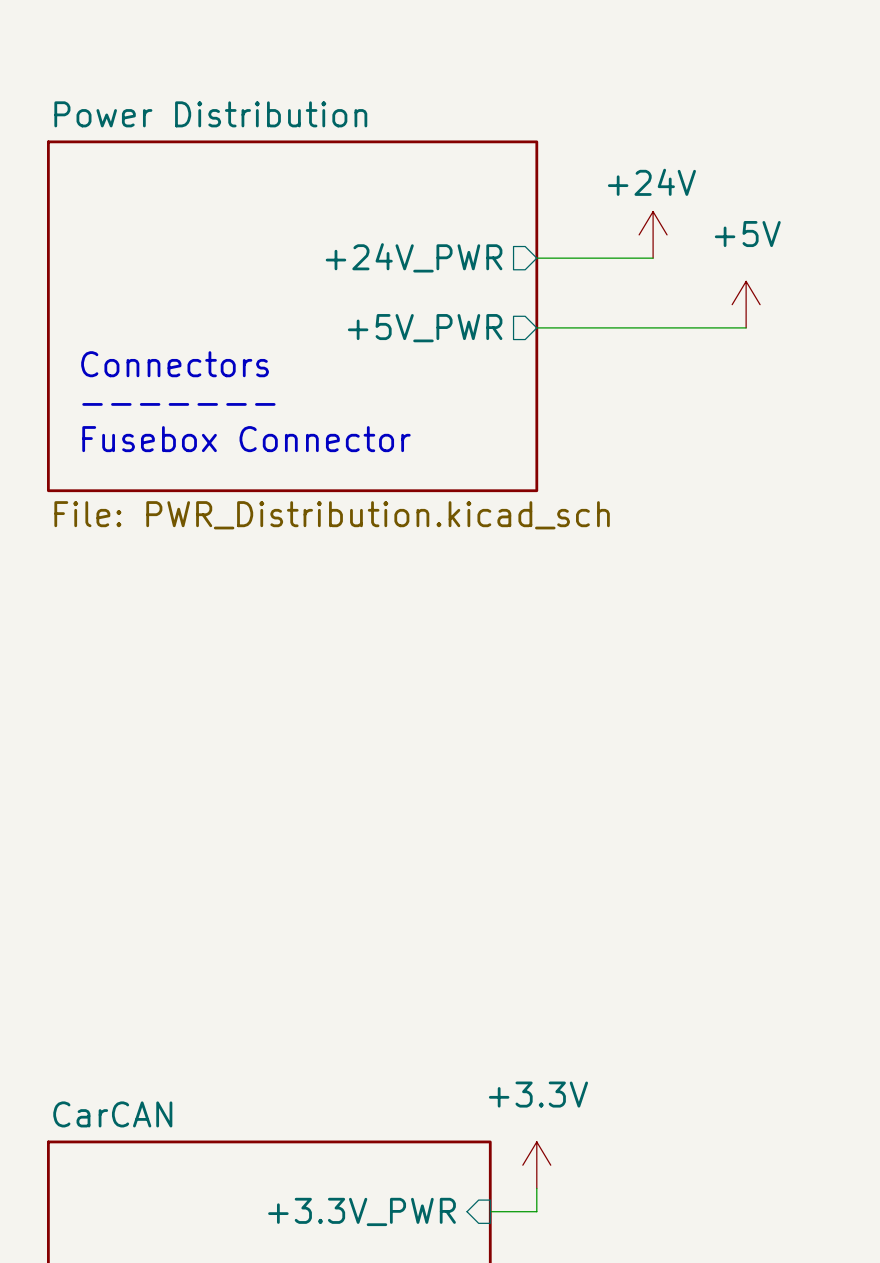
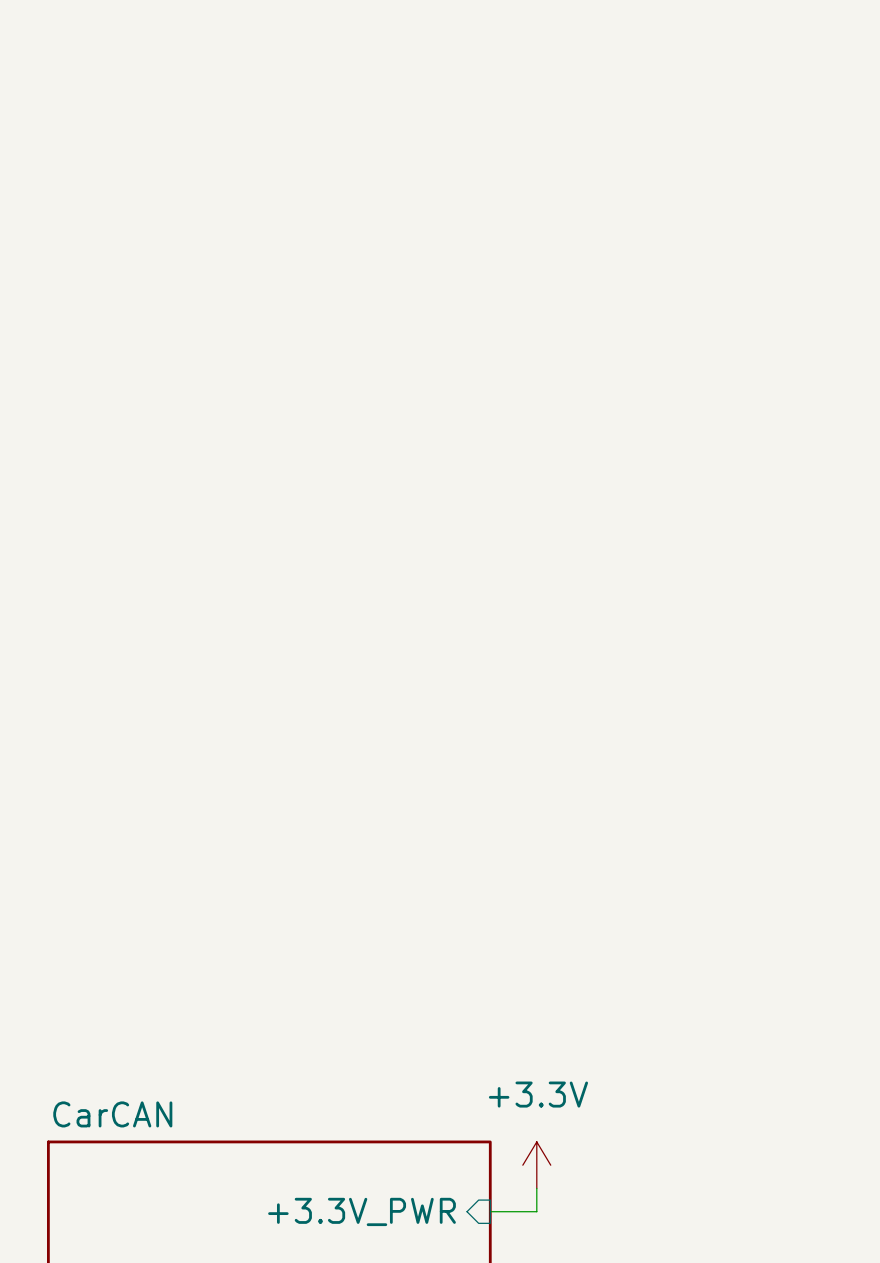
power symbol: +24V (653, 234) -> none
sheet pin: +24V_PWR (414, 257) -> none
wire: (536, 258) (653, 258) -> none
power symbol: +5V (746, 304) -> none
sheet Power Distribution: File: PWR_Distribution.kicad_sch (292, 316) -> none
wire: (536, 327) (746, 327) -> none
sheet pin: +5V_PWR (425, 328) -> none
text: Connectors (175, 364) -> none
text: ------- (178, 404) -> none
text: Fusebox Connector (246, 439) -> none

